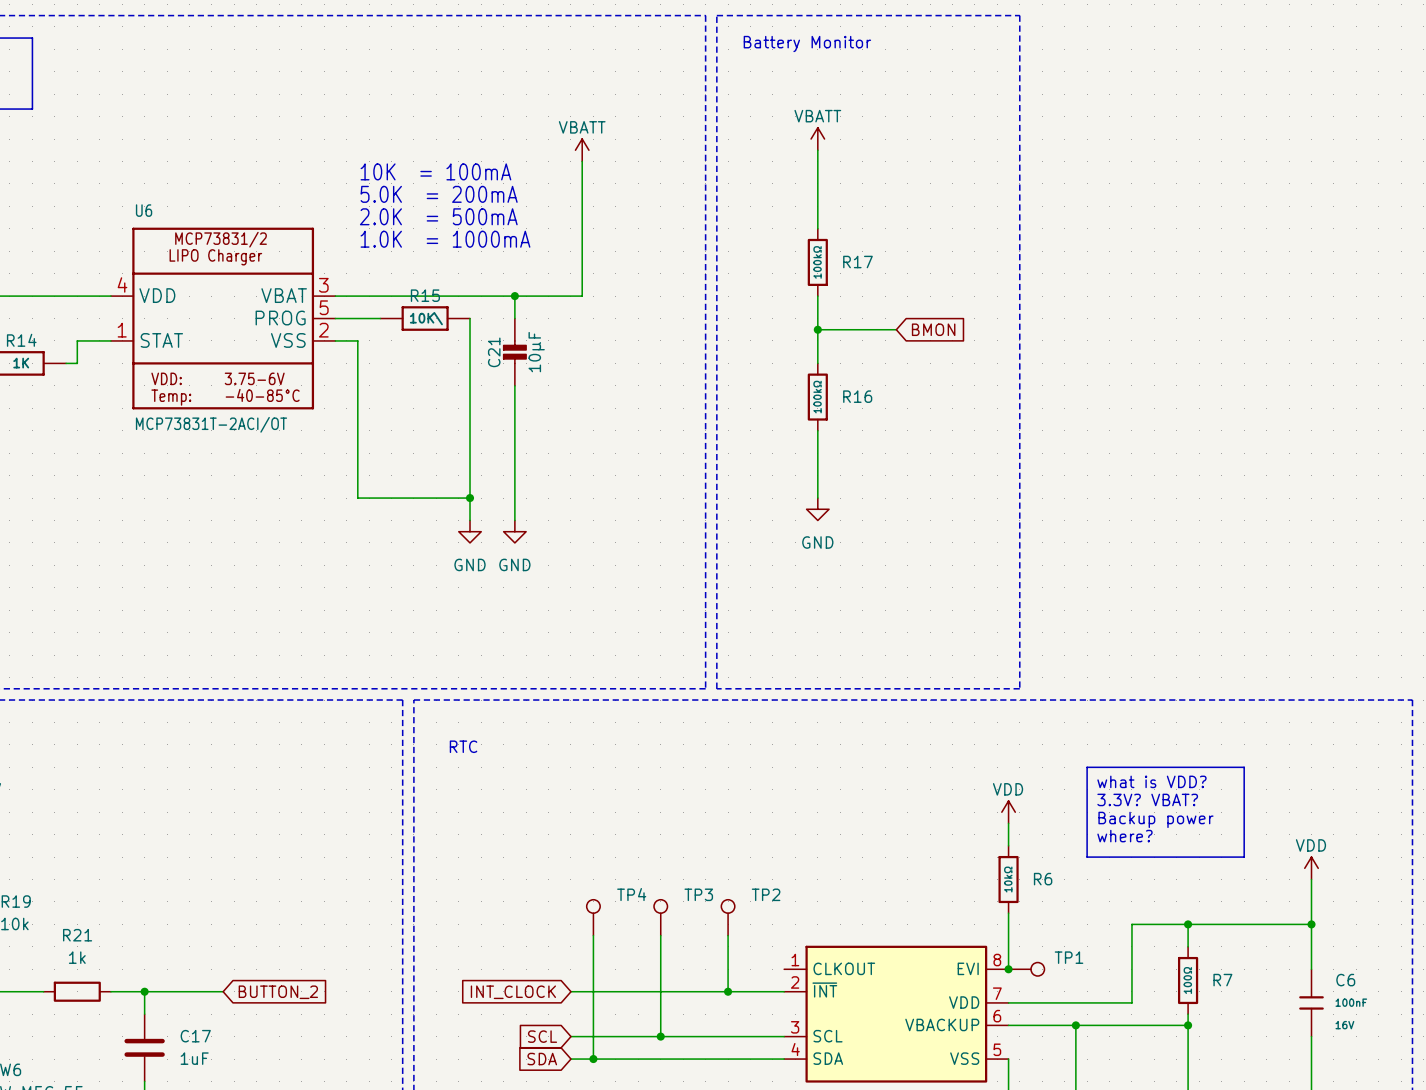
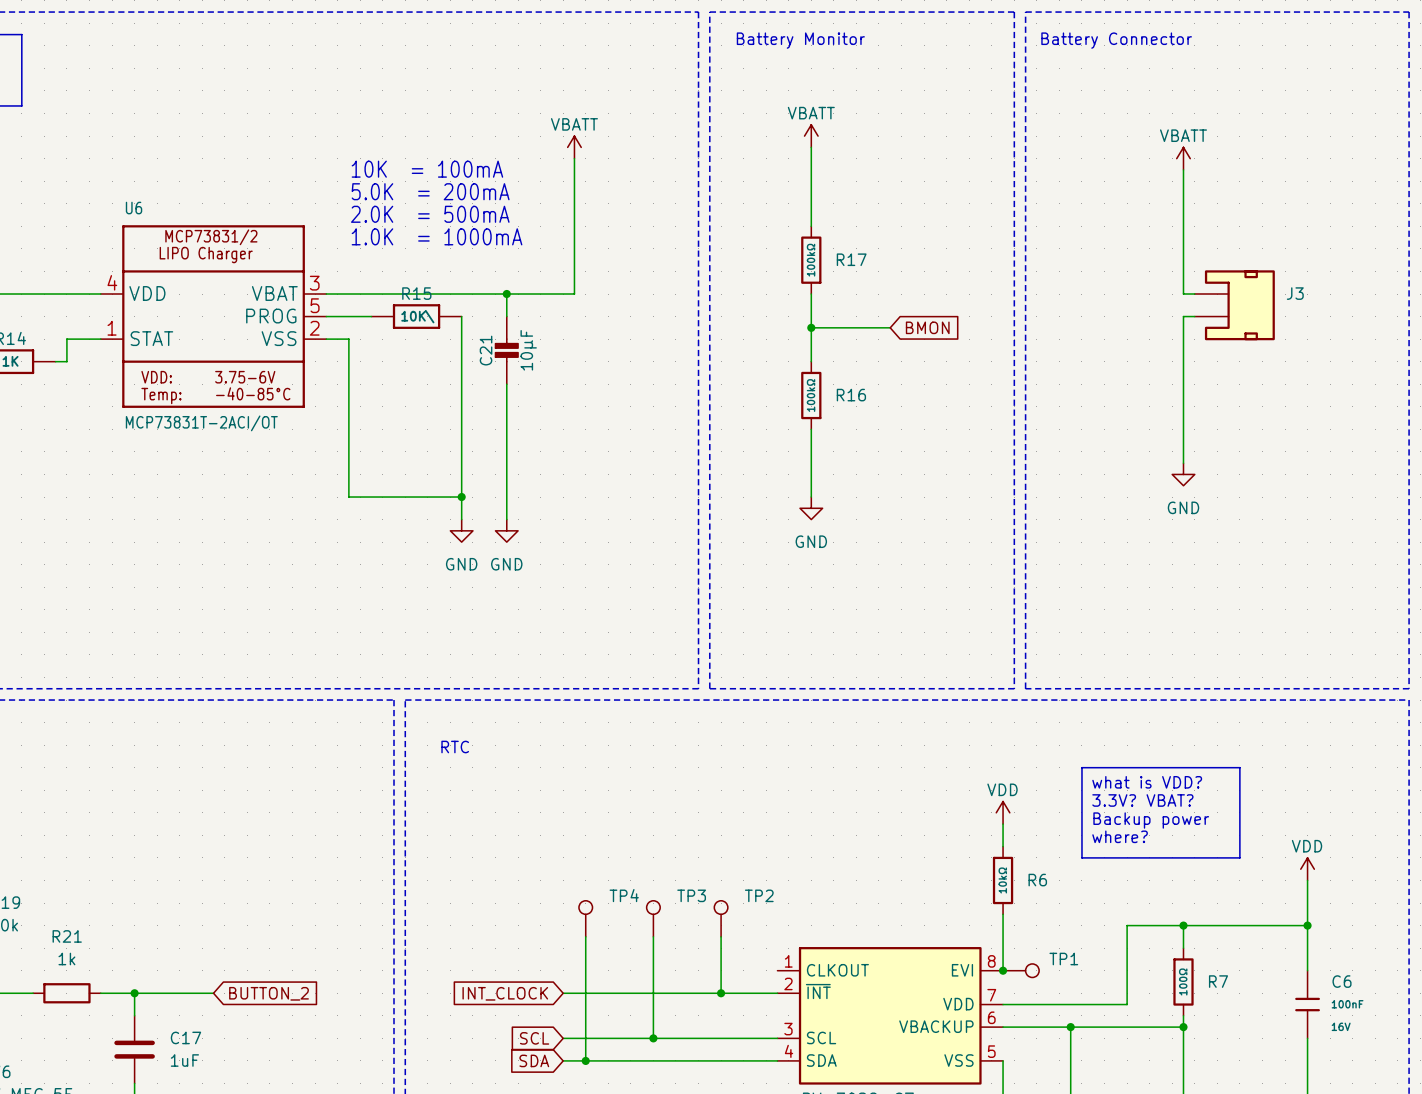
line: none -> (1025, 12) (1409, 12) (1409, 688) (1025, 688) (1025, 12)
text: none -> Battery Connector (1116, 40)
power symbol: none -> VBATT (1183, 158)
wire: none -> (1183, 169) (1183, 294) (1194, 294)
J3: none -> (1234, 305)
wire: none -> (1194, 316) (1183, 316) (1183, 463)
power symbol: none -> GND (1183, 474)

